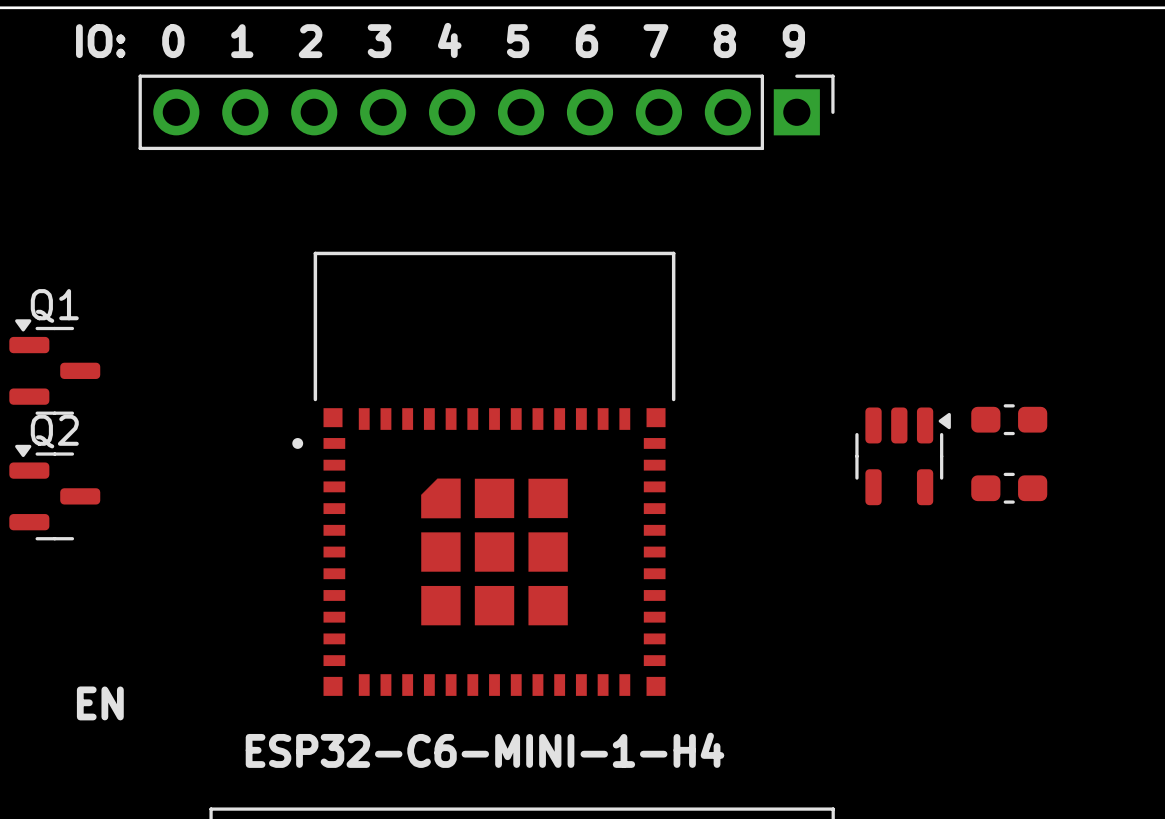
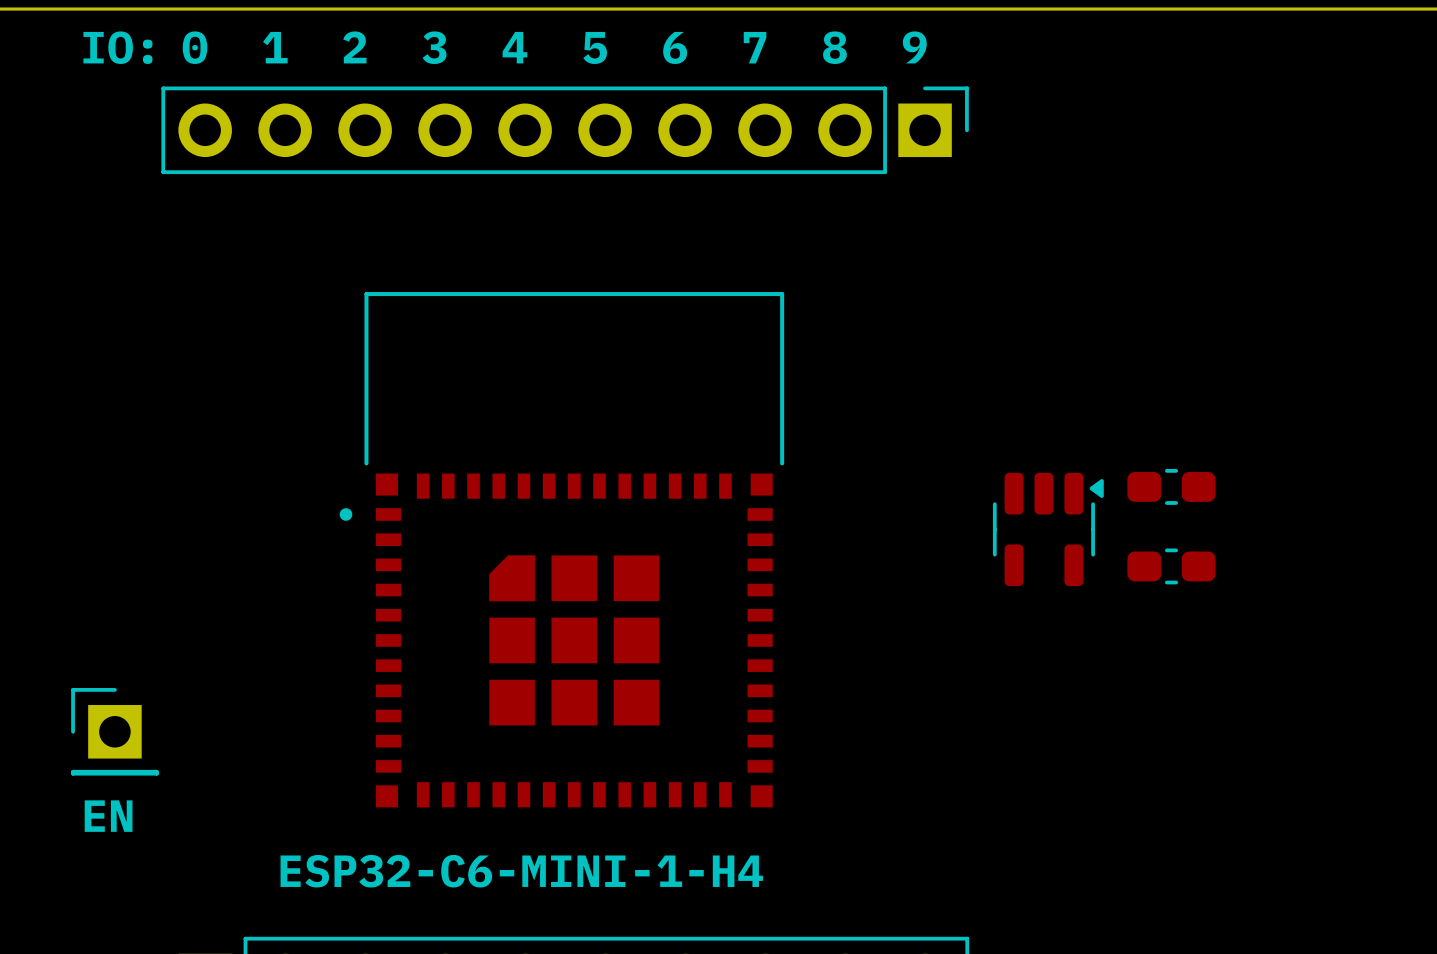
Q1: (54, 367) -> none
Q2: (54, 492) -> none
part: none -> (114, 731)

